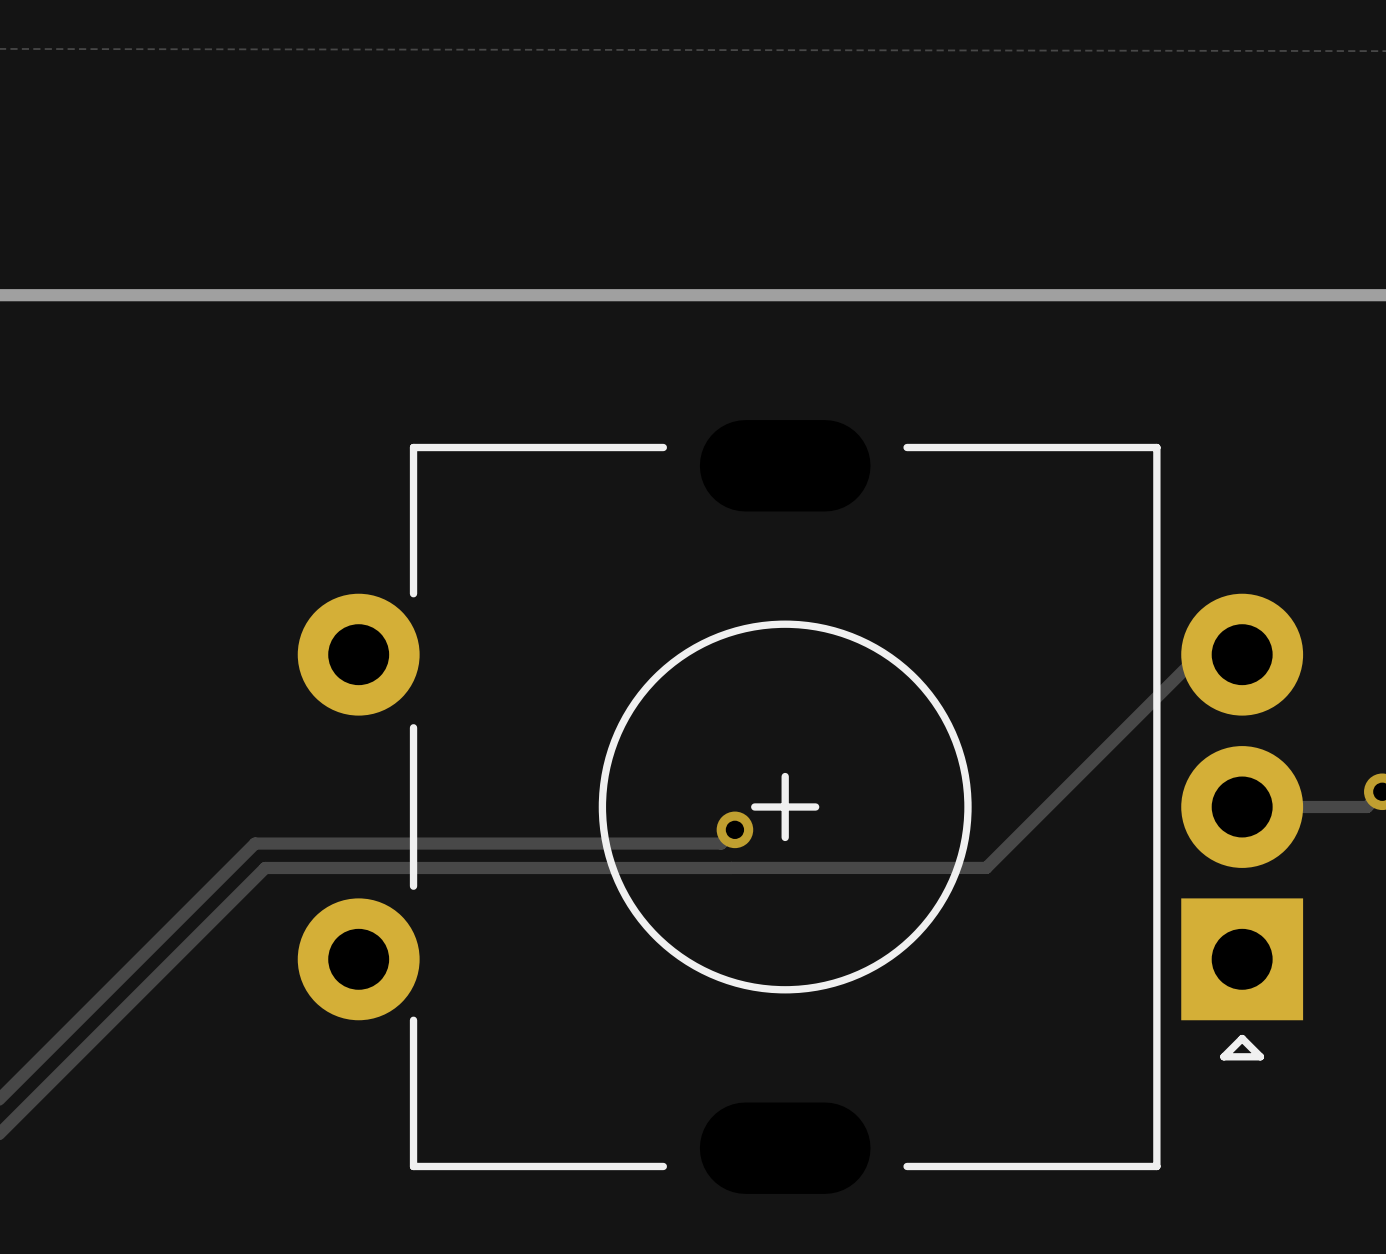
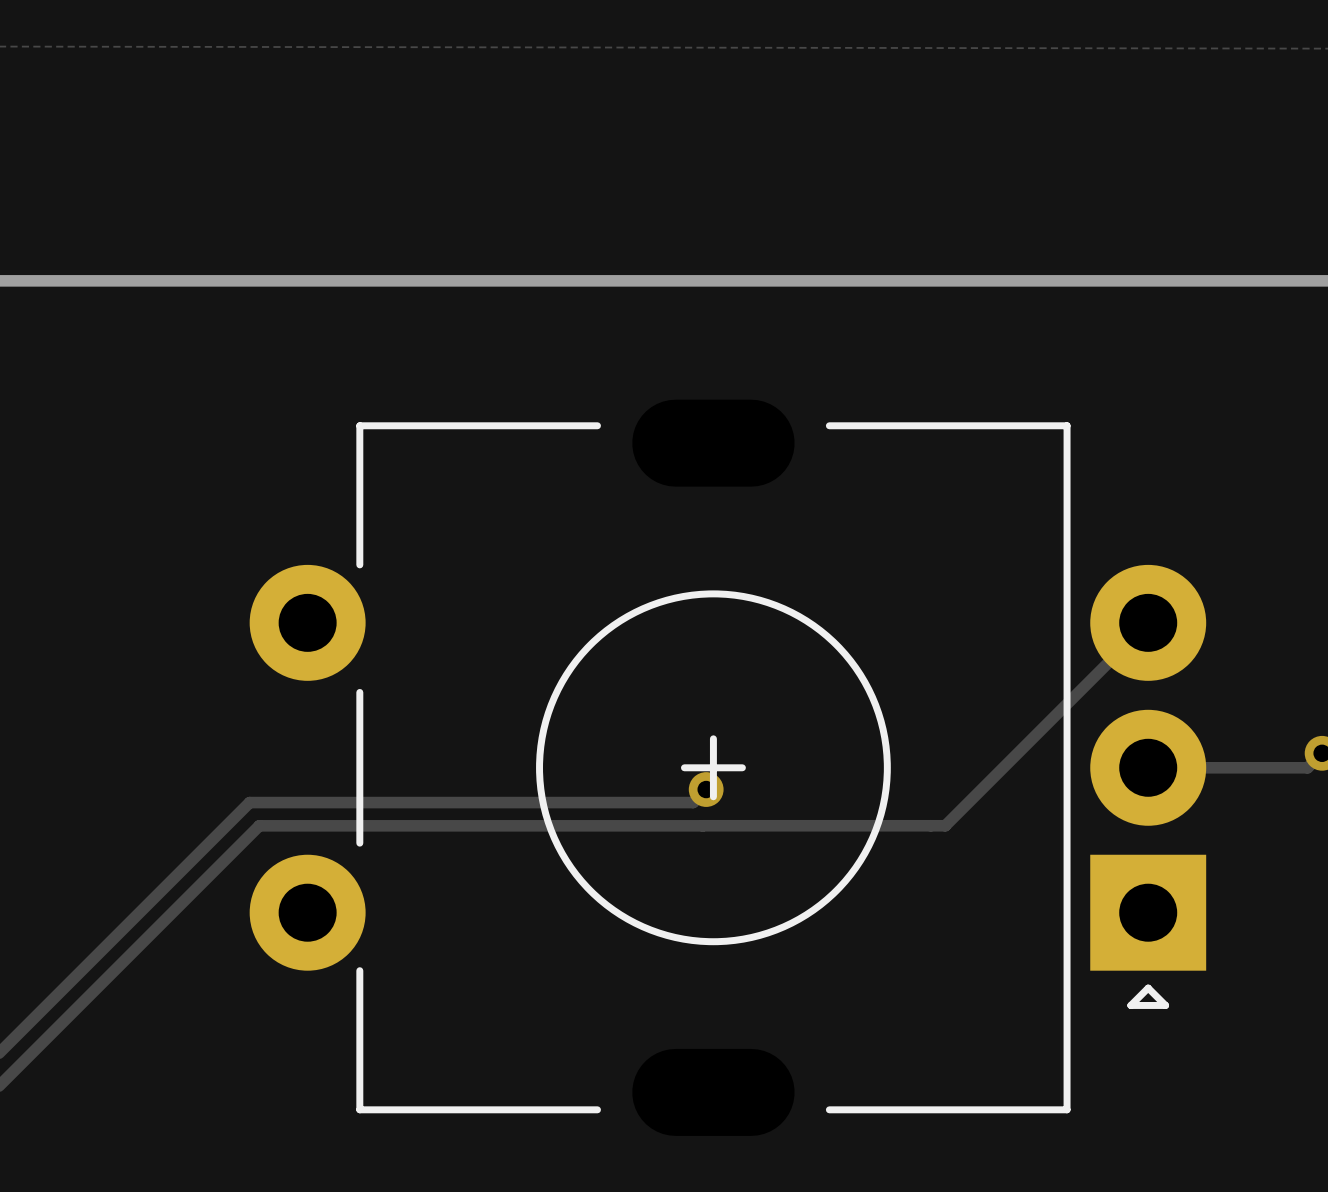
part position: (800, 806) -> (727, 767)

